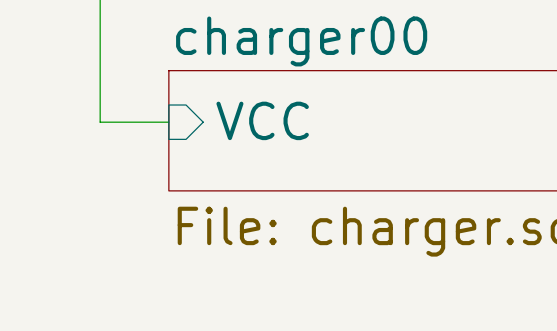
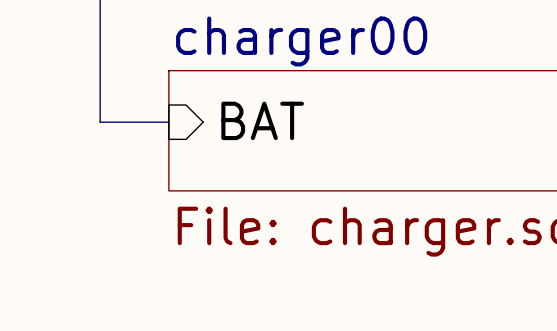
sheet pin: VCC (262, 120) -> BAT (262, 120)

